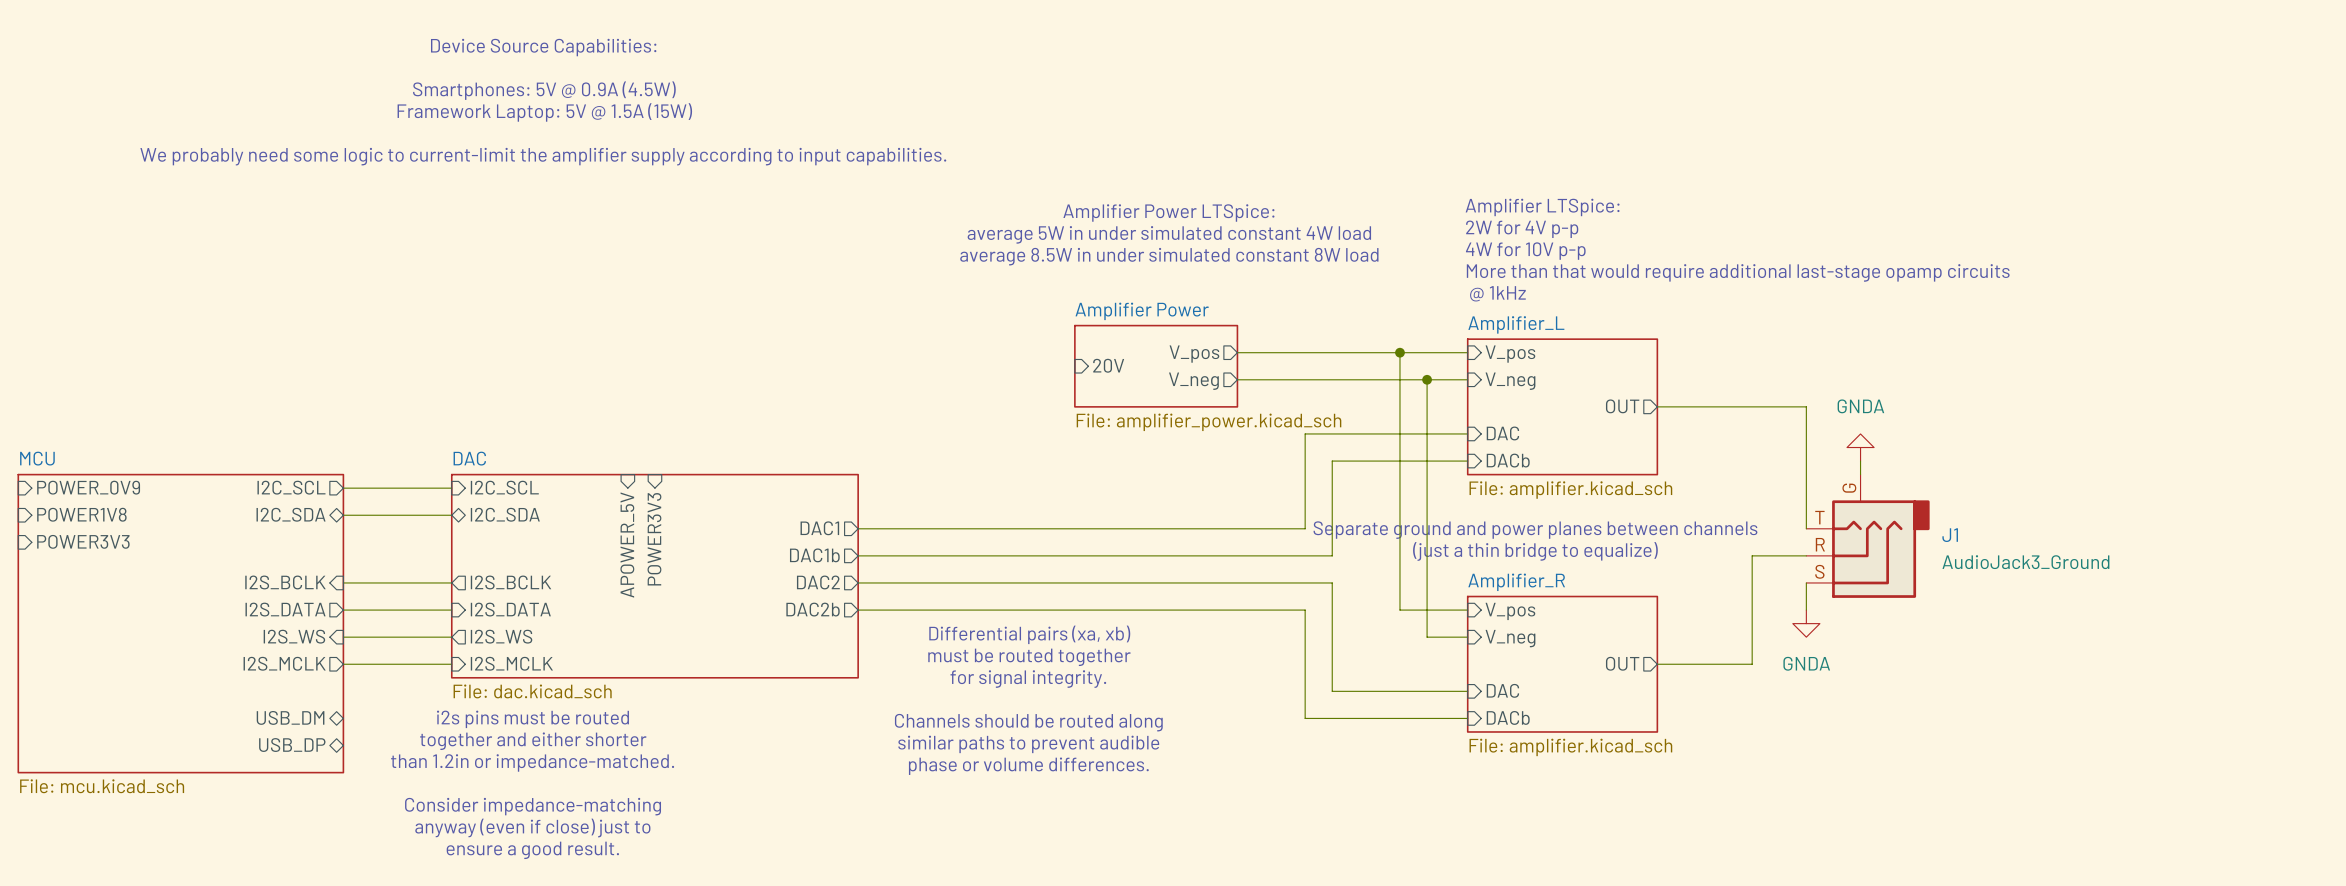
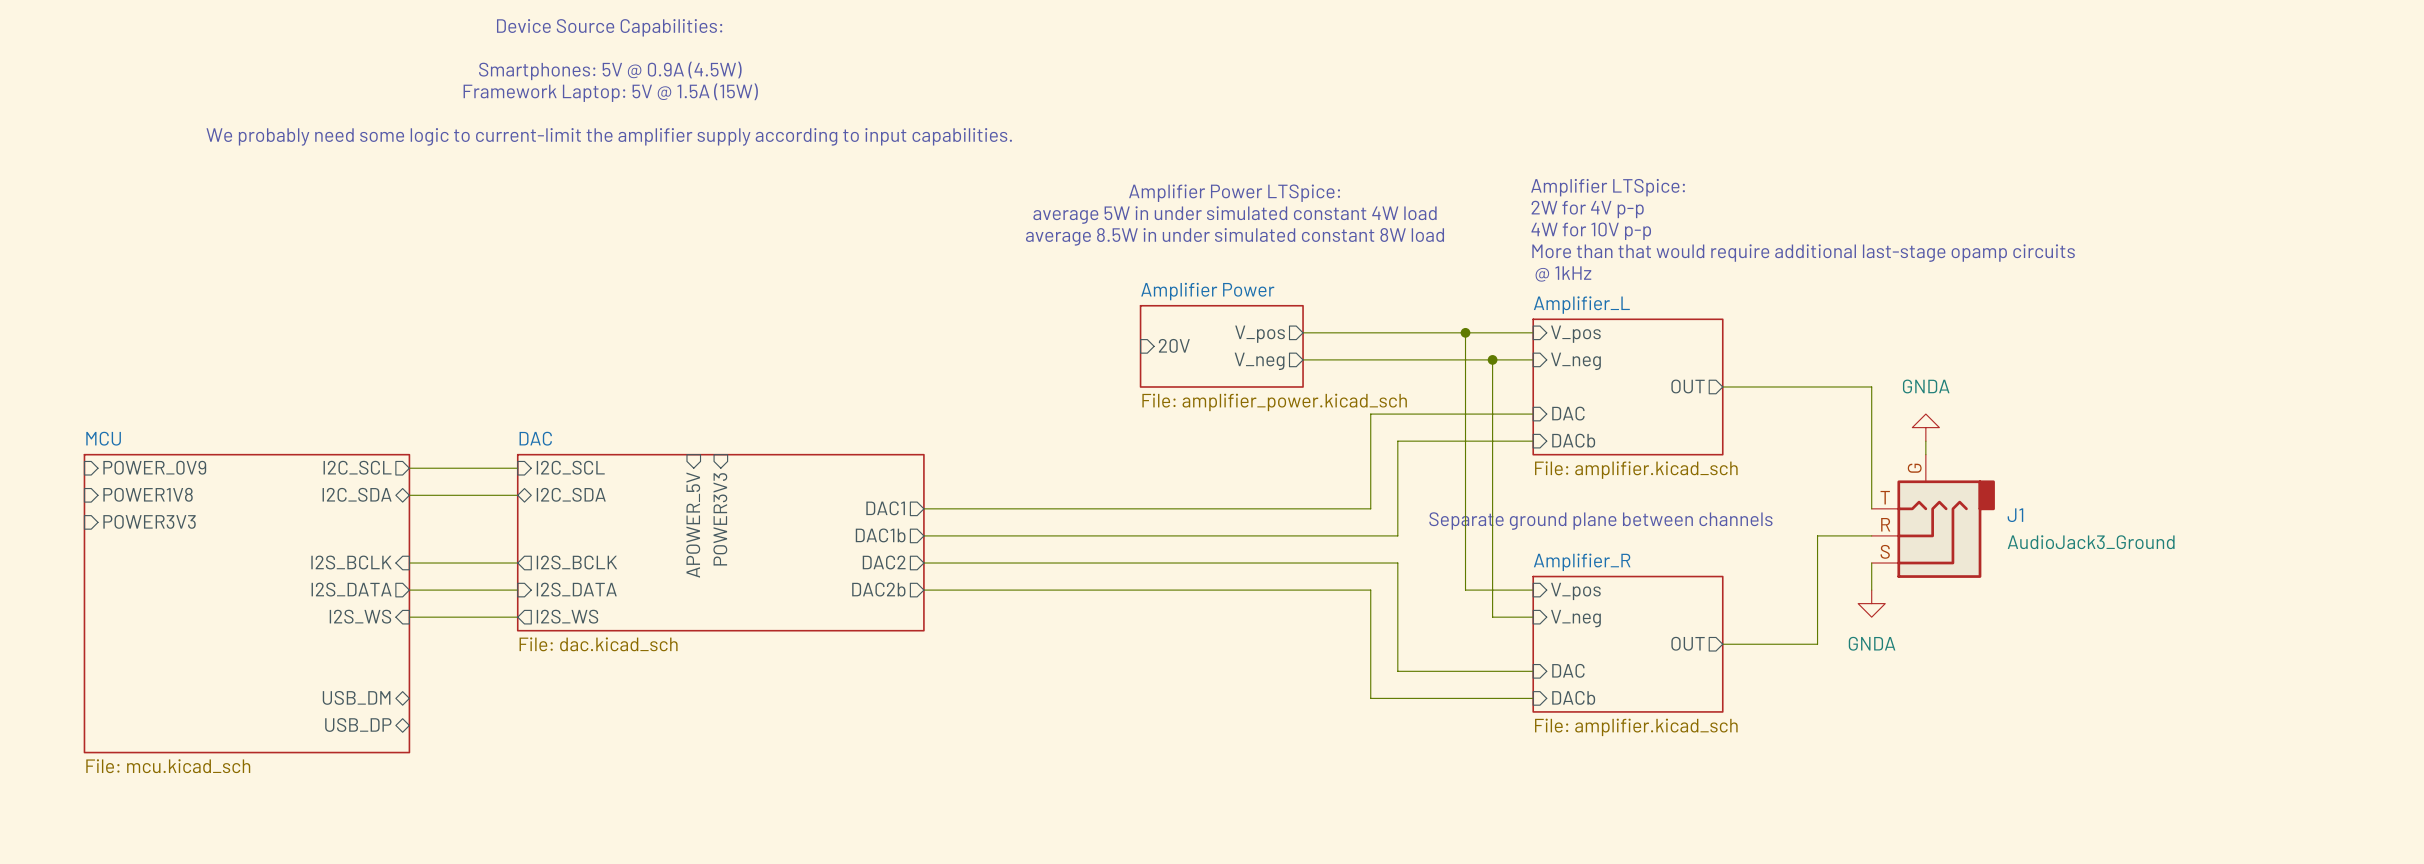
text: Separate ground and power planes between channels (1535, 530) -> Separate ground plane between channels (1600, 521)
text: (just a thin bridge to equalize) (1535, 551) -> none
sheet DAC: none -> File: dac.kicad_sch (720, 542)
sheet DAC: File: dac.kicad_sch (654, 576) -> none
text: Differential pairs (xa, xb) (1029, 634) -> none
text: must be routed together (1029, 657) -> none
sheet pin: I2S_MCLK (284, 663) -> none
sheet pin: I2S_MCLK (511, 663) -> none
wire: (343, 664) (451, 664) -> none
text: for signal integrity. (1028, 679) -> none
text: i2s pins must be routed (532, 719) -> none
text: Channels should be routed along (1028, 722) -> none
text: together and either shorter (533, 741) -> none
text: similar paths to prevent audible (1028, 744) -> none
text: than 1.2in or impedance-matched. (532, 762) -> none
text: phase or volume differences. (1028, 766) -> none
text: Consider impedance-matching (533, 806) -> none
text: anyway (even if close) just to (532, 828) -> none
text: ensure a good result. (532, 850) -> none

